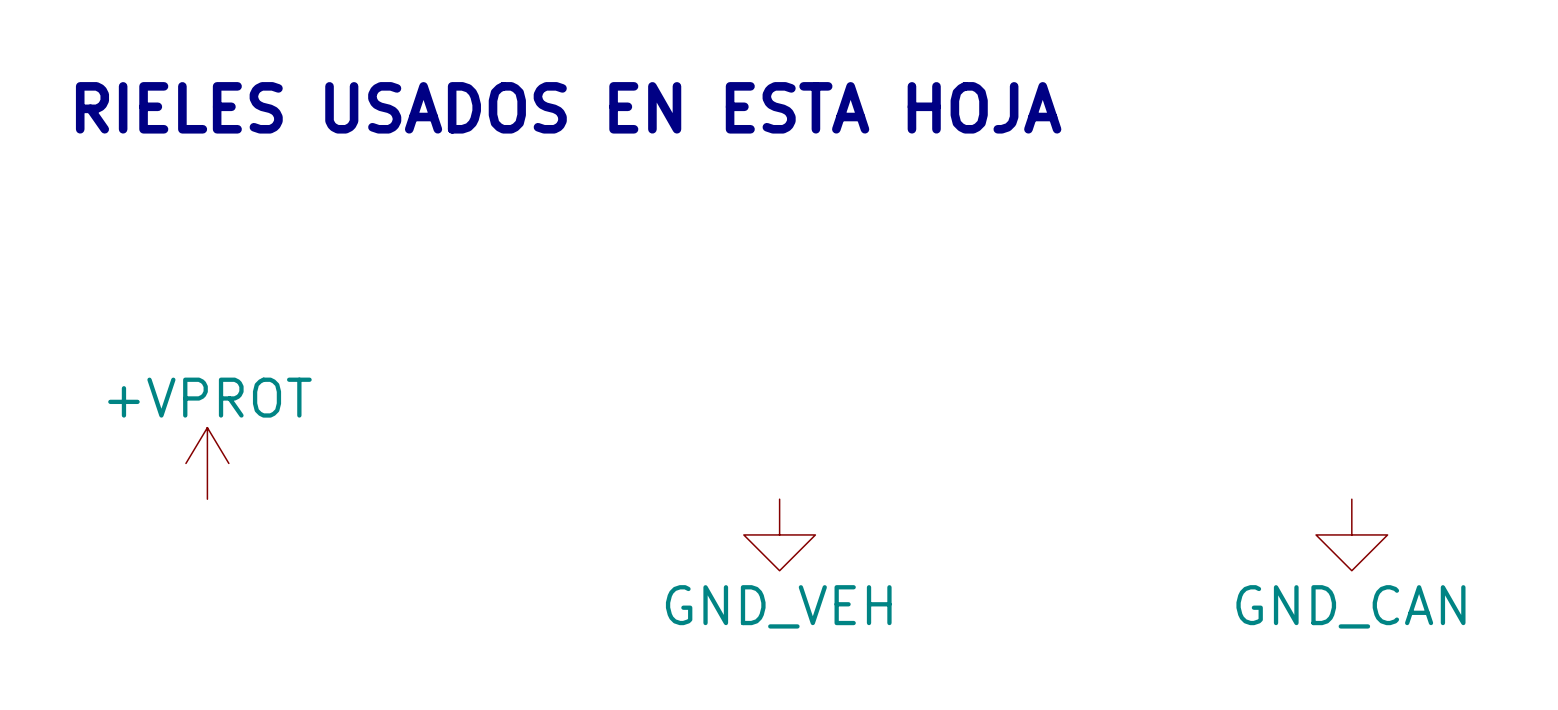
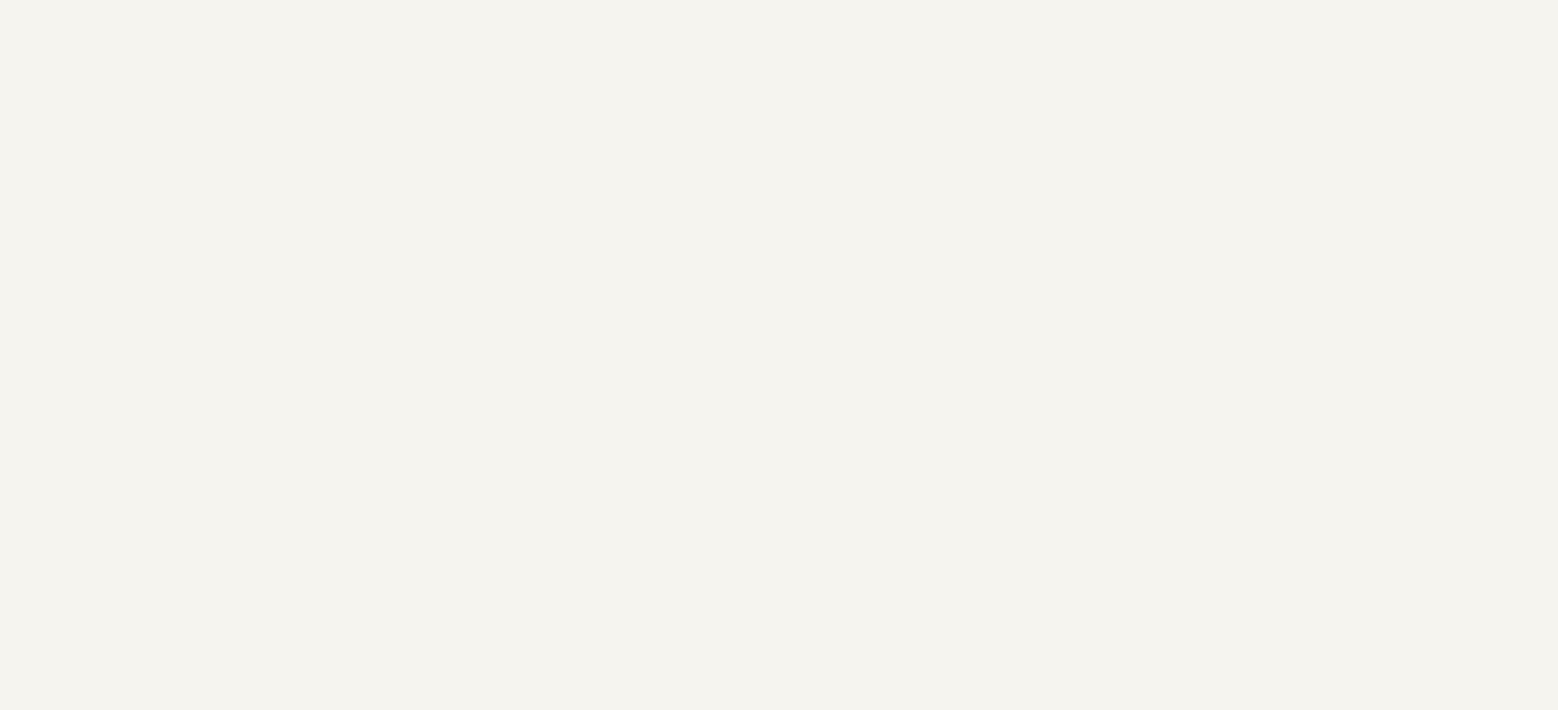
text: RIELES USADOS EN ESTA HOJA (568, 107) -> none
power symbol: +VPROT (207, 463) -> none
power symbol: GND_VEH (779, 534) -> none
power symbol: GND_CAN (1351, 534) -> none

